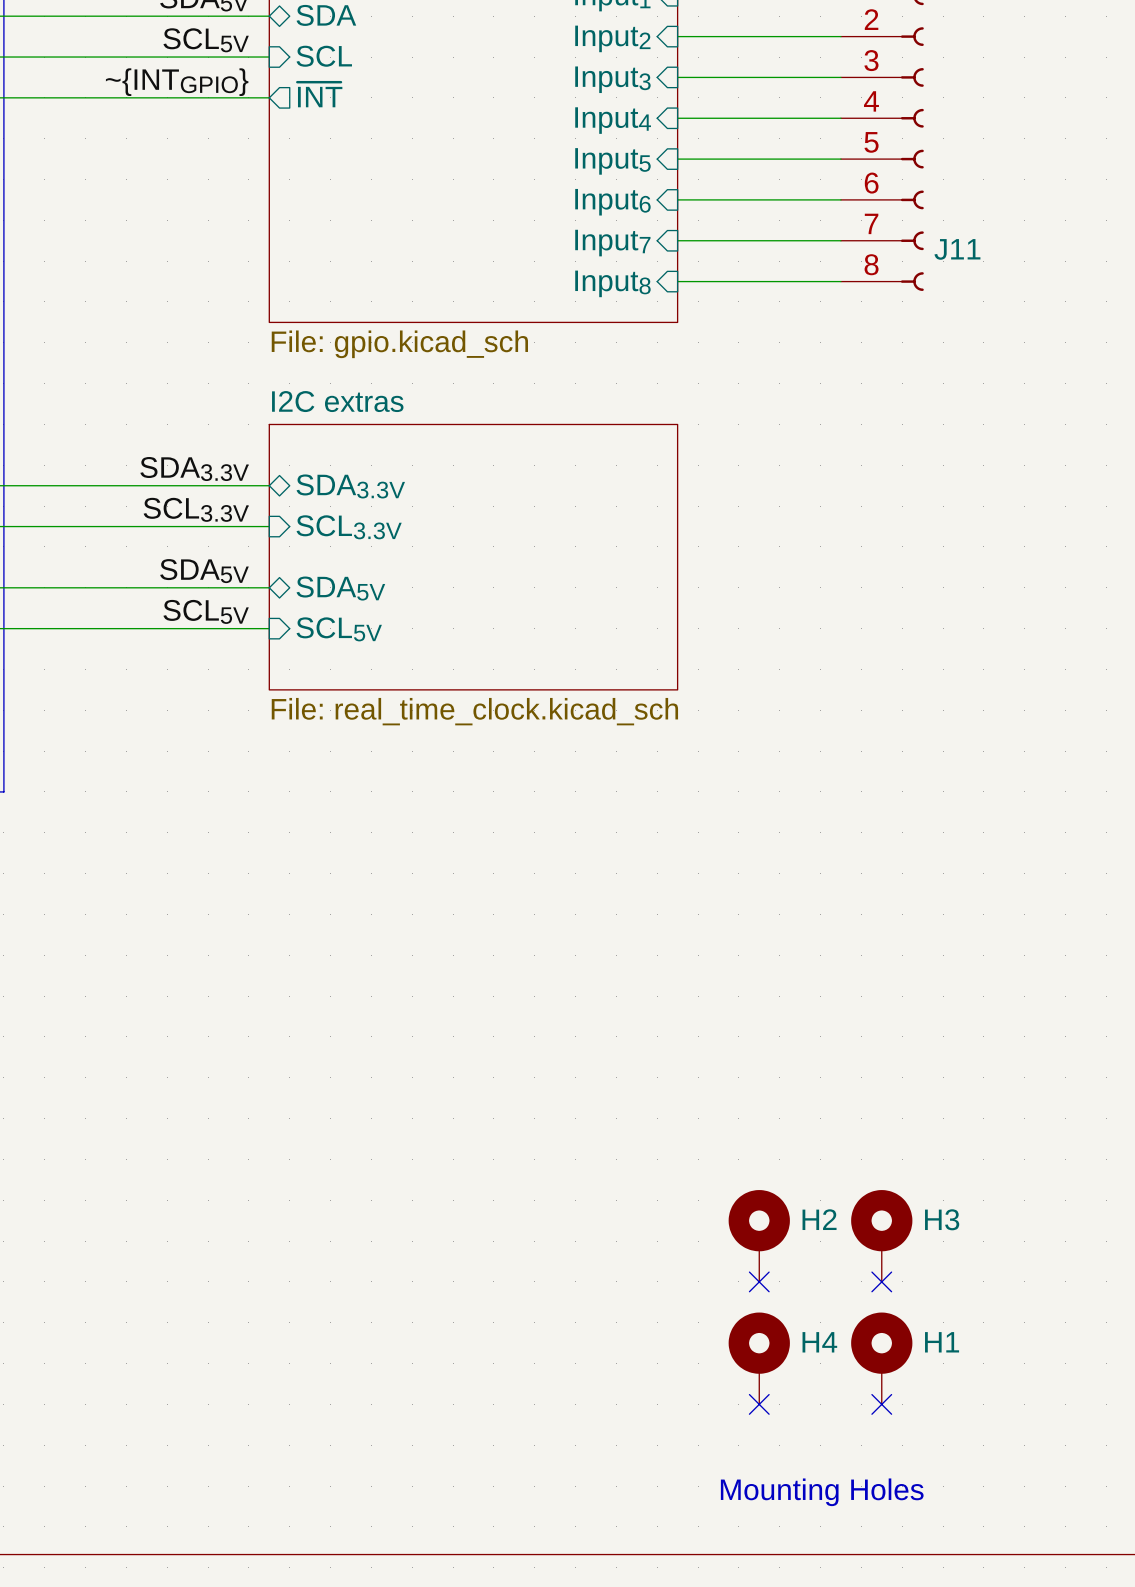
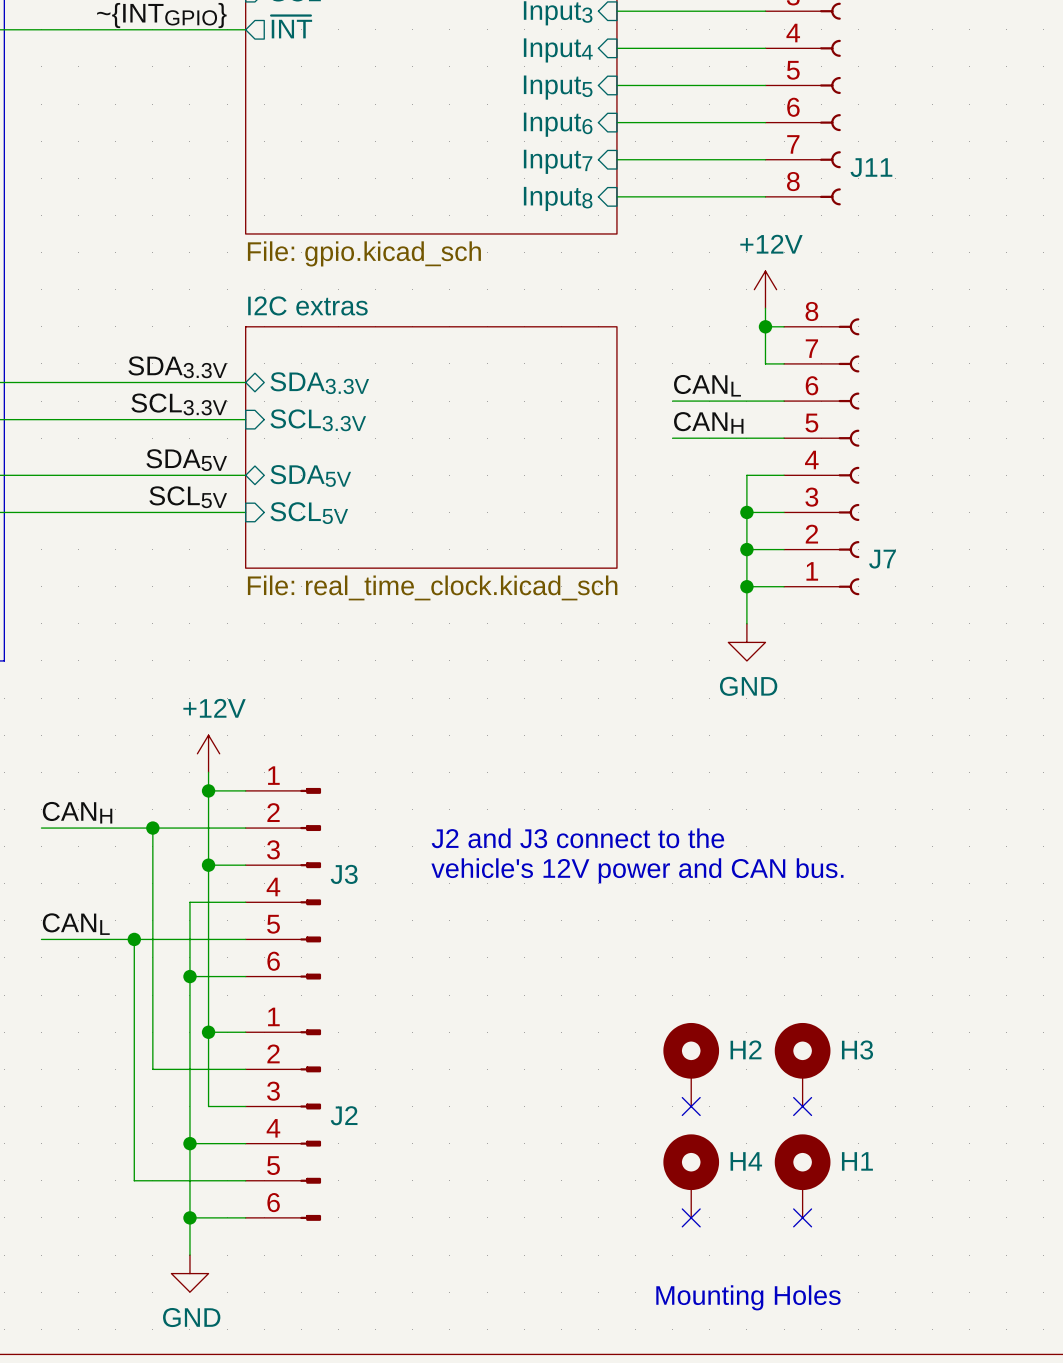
power symbol: none -> +12V (765, 289)
wire: none -> (765, 308) (765, 363) (784, 363)
wire: none -> (765, 326) (784, 326)
junction: none -> (765, 326)
label: none -> CANL (707, 385)
wire: none -> (672, 401) (784, 401)
label: none -> CANH (708, 422)
wire: none -> (672, 438) (784, 438)
J7: none -> (821, 456)
wire: none -> (784, 475) (746, 475) (746, 623)
wire: none -> (746, 512) (784, 512)
junction: none -> (746, 512)
wire: none -> (746, 549) (784, 549)
junction: none -> (746, 549)
wire: none -> (746, 586) (784, 586)
junction: none -> (746, 586)
power symbol: none -> GND (746, 642)
power symbol: none -> +12V (208, 753)
wire: none -> (208, 772) (208, 1106) (245, 1106)
wire: none -> (208, 790) (245, 790)
junction: none -> (208, 790)
label: none -> CANH (77, 812)
wire: none -> (41, 828) (245, 828)
wire: none -> (152, 828) (152, 1069) (245, 1069)
junction: none -> (152, 828)
text: none -> J2 and J3 connect to the (577, 838)
wire: none -> (208, 865) (245, 865)
junction: none -> (208, 865)
text: none -> vehicle's 12V power and CAN bus. (637, 870)
J3: none -> (283, 883)
wire: none -> (245, 902) (189, 902) (189, 1255)
label: none -> CANL (76, 924)
wire: none -> (41, 939) (245, 939)
wire: none -> (134, 939) (134, 1180) (245, 1180)
junction: none -> (134, 939)
wire: none -> (189, 976) (245, 976)
junction: none -> (189, 976)
wire: none -> (208, 1032) (245, 1032)
junction: none -> (208, 1032)
J2: none -> (283, 1125)
wire: none -> (189, 1143) (245, 1143)
junction: none -> (189, 1143)
wire: none -> (189, 1217) (245, 1217)
junction: none -> (189, 1217)
power symbol: none -> GND (189, 1273)

